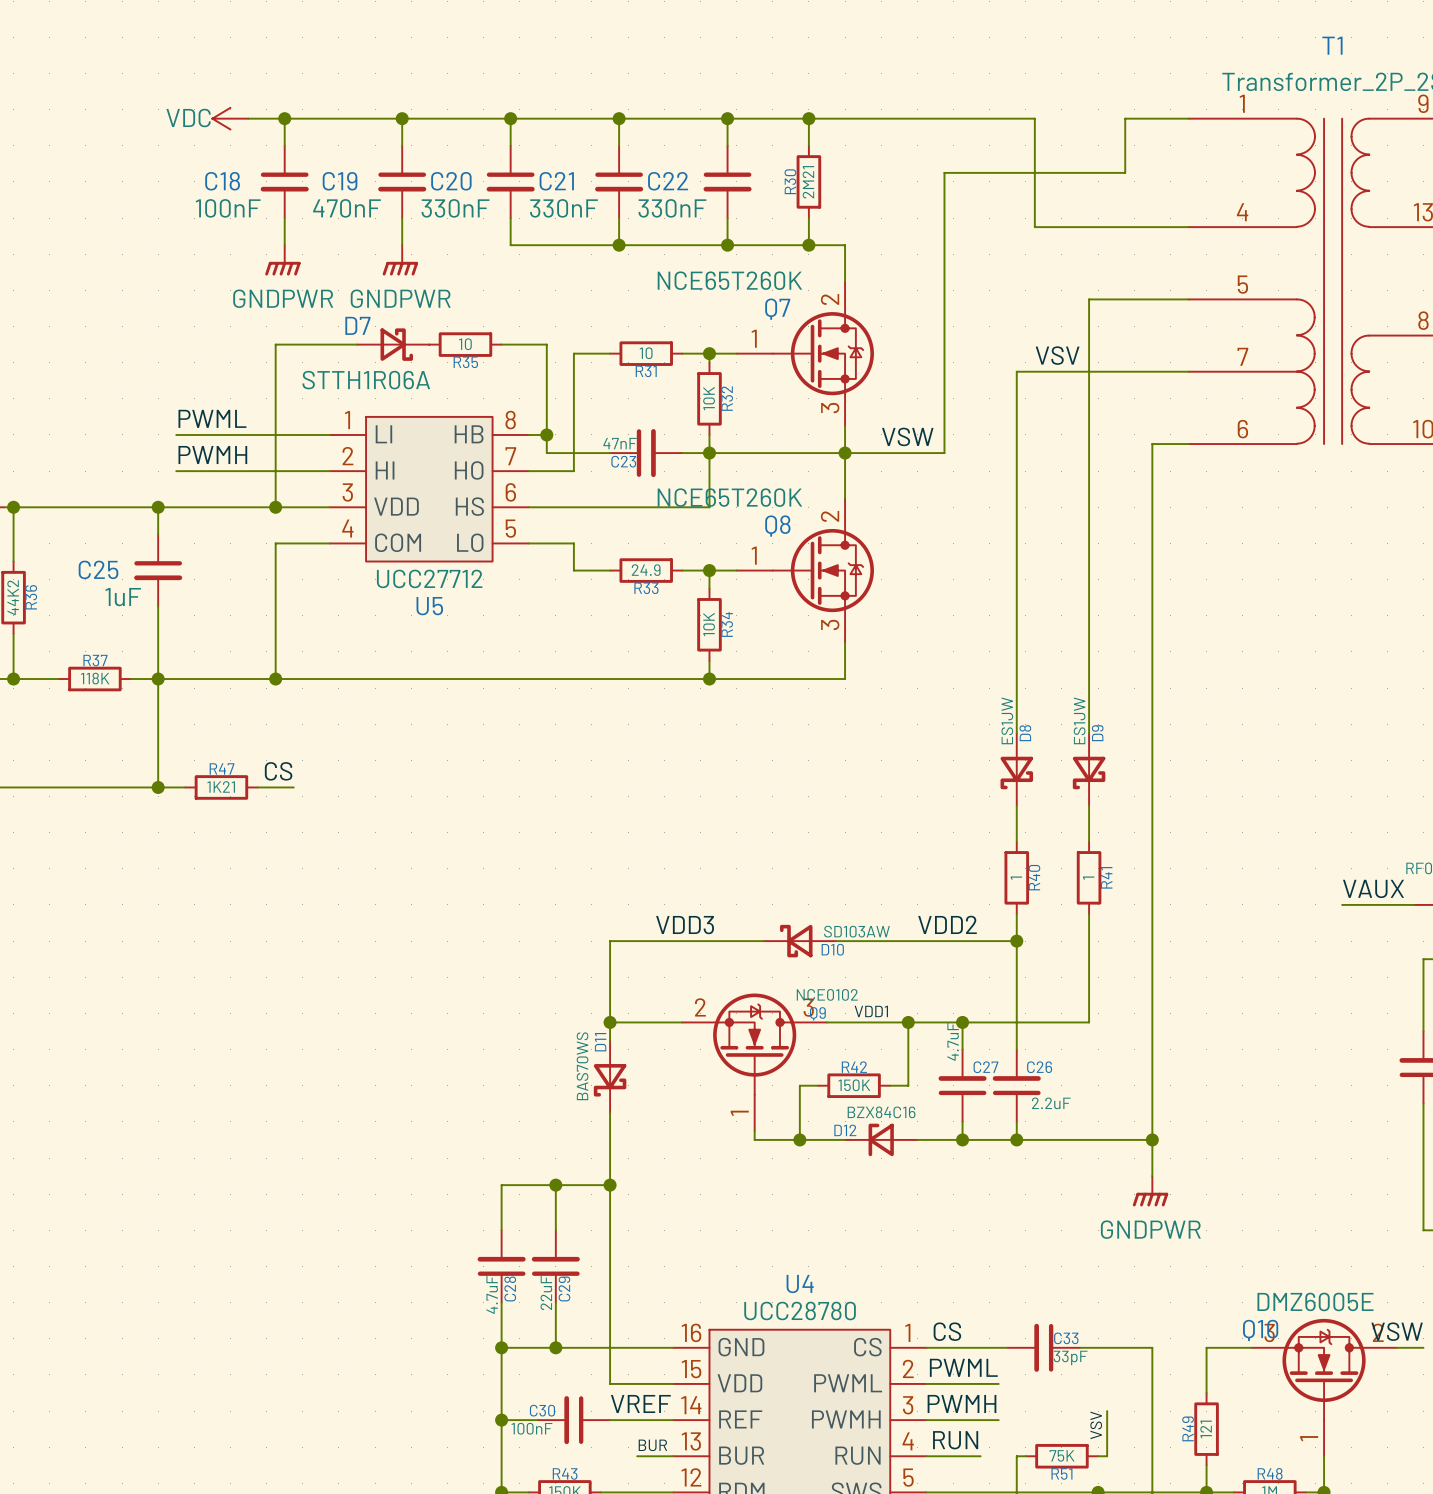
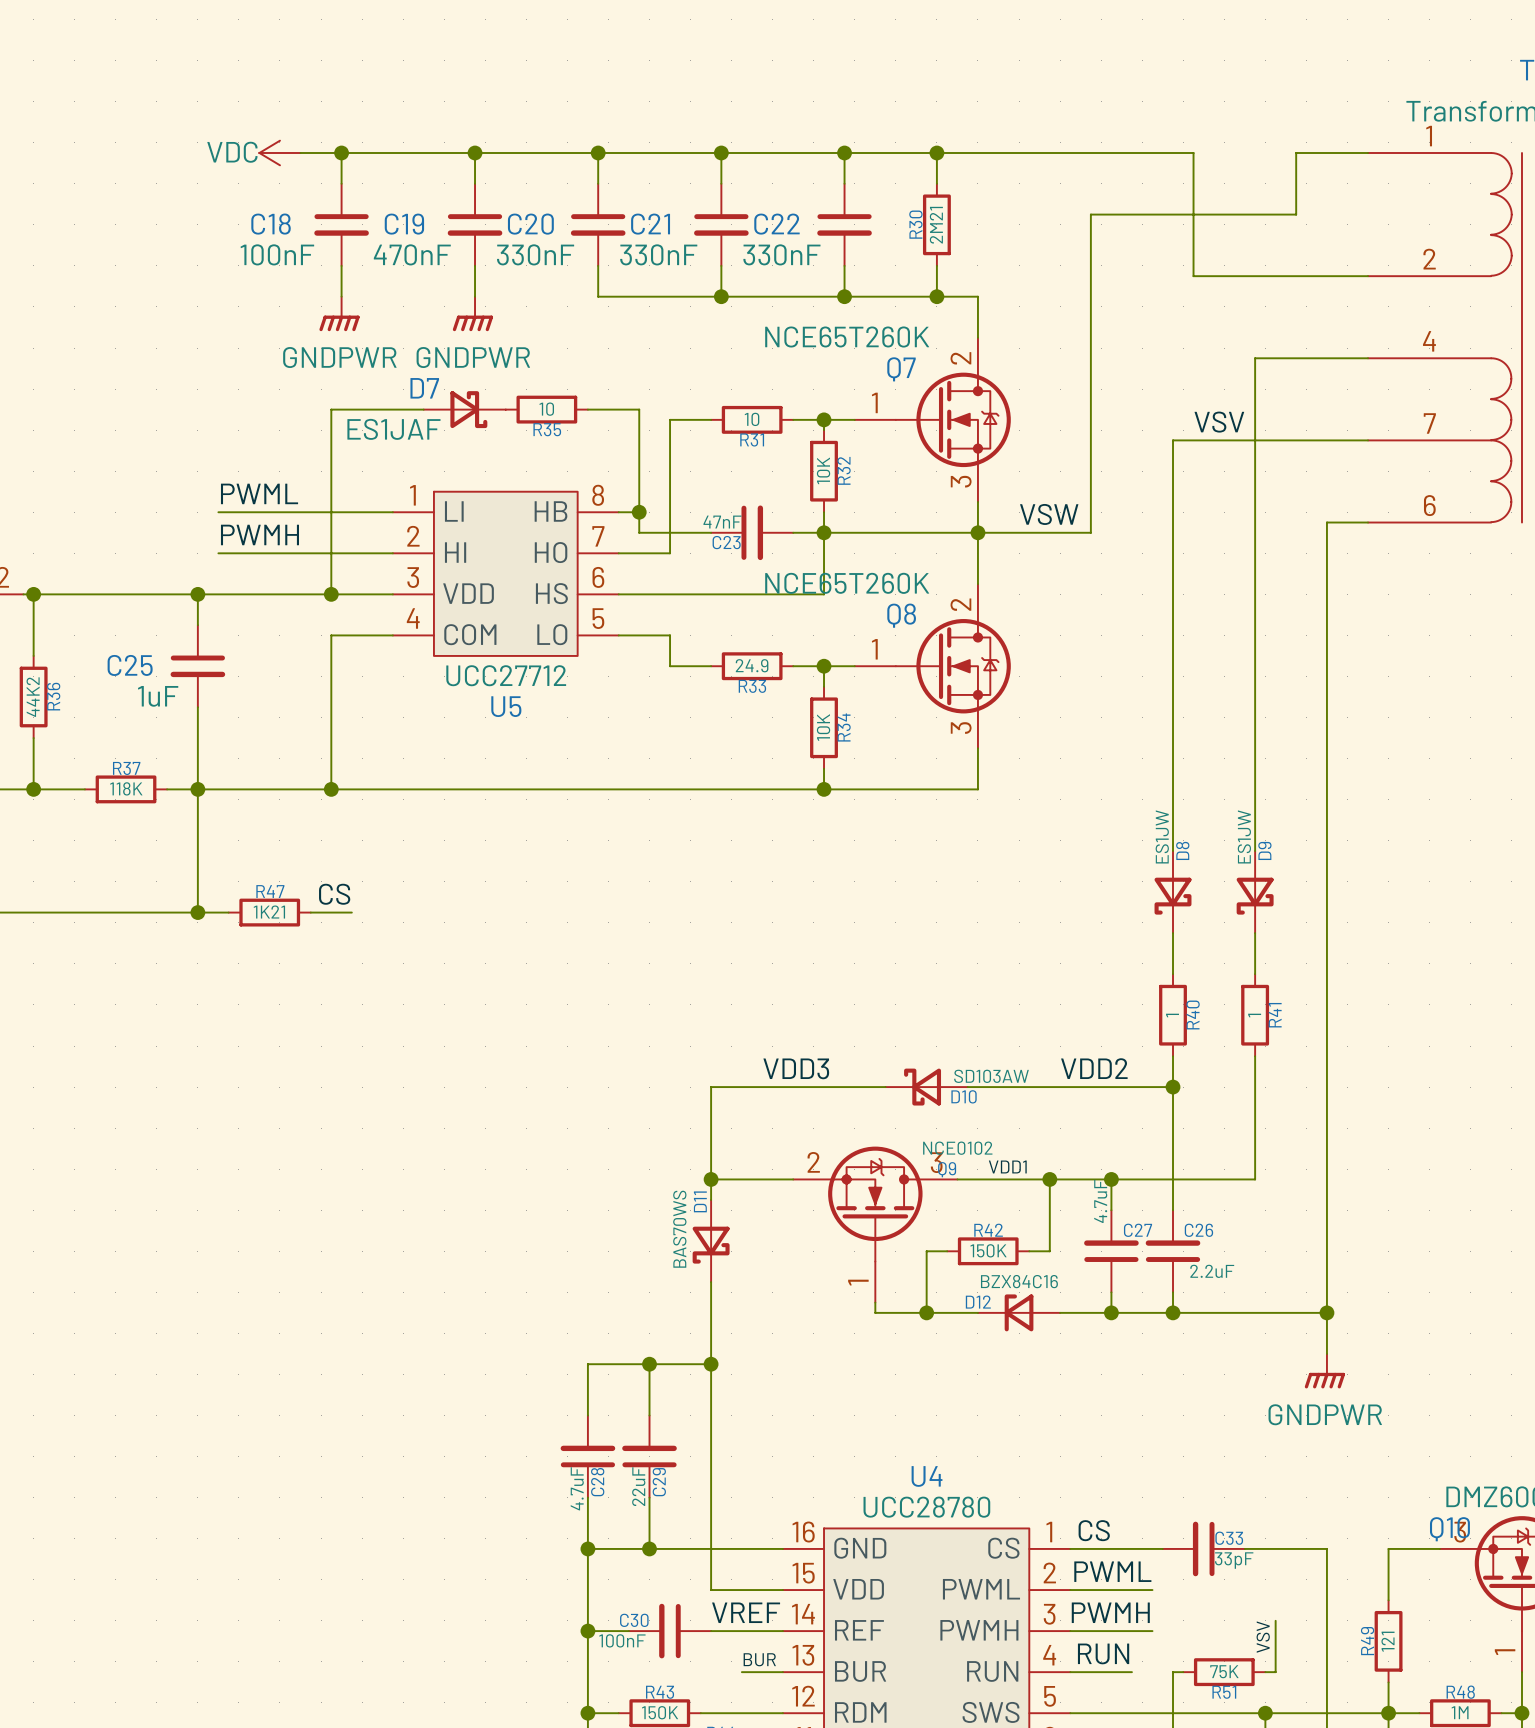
T1 pin number: 4 (1242, 212) -> 2 (1429, 259)
T1 pin number: 5 (1242, 284) -> 4 (1429, 341)
D7 value: STTH1R06A (366, 380) -> ES1JAF (393, 429)

